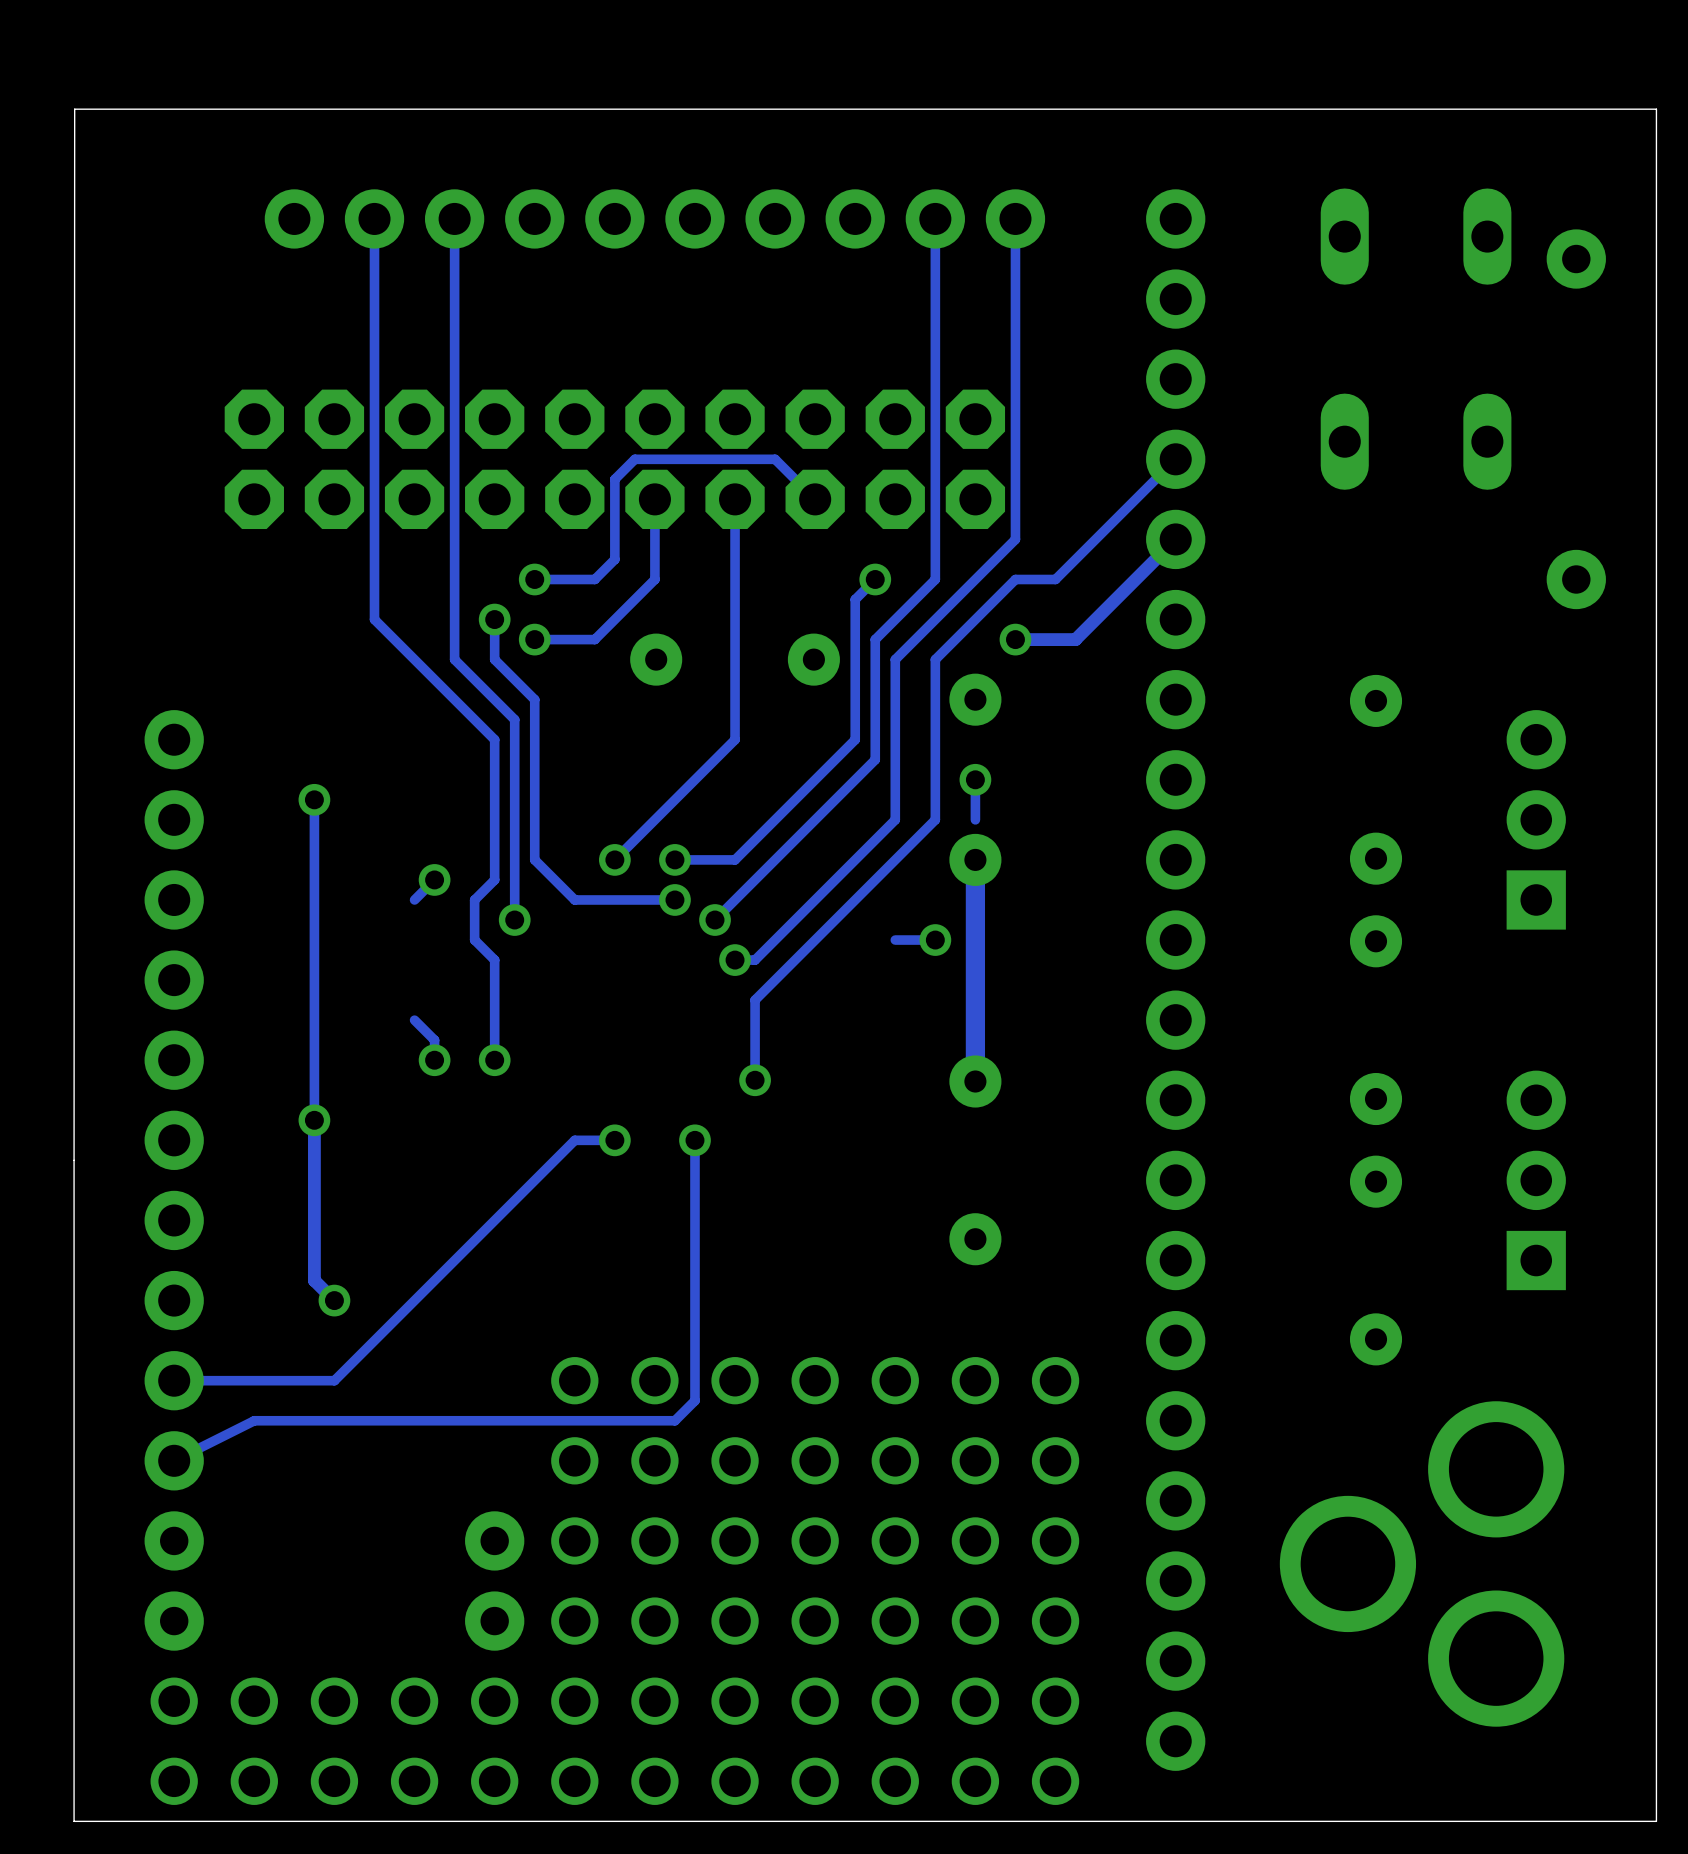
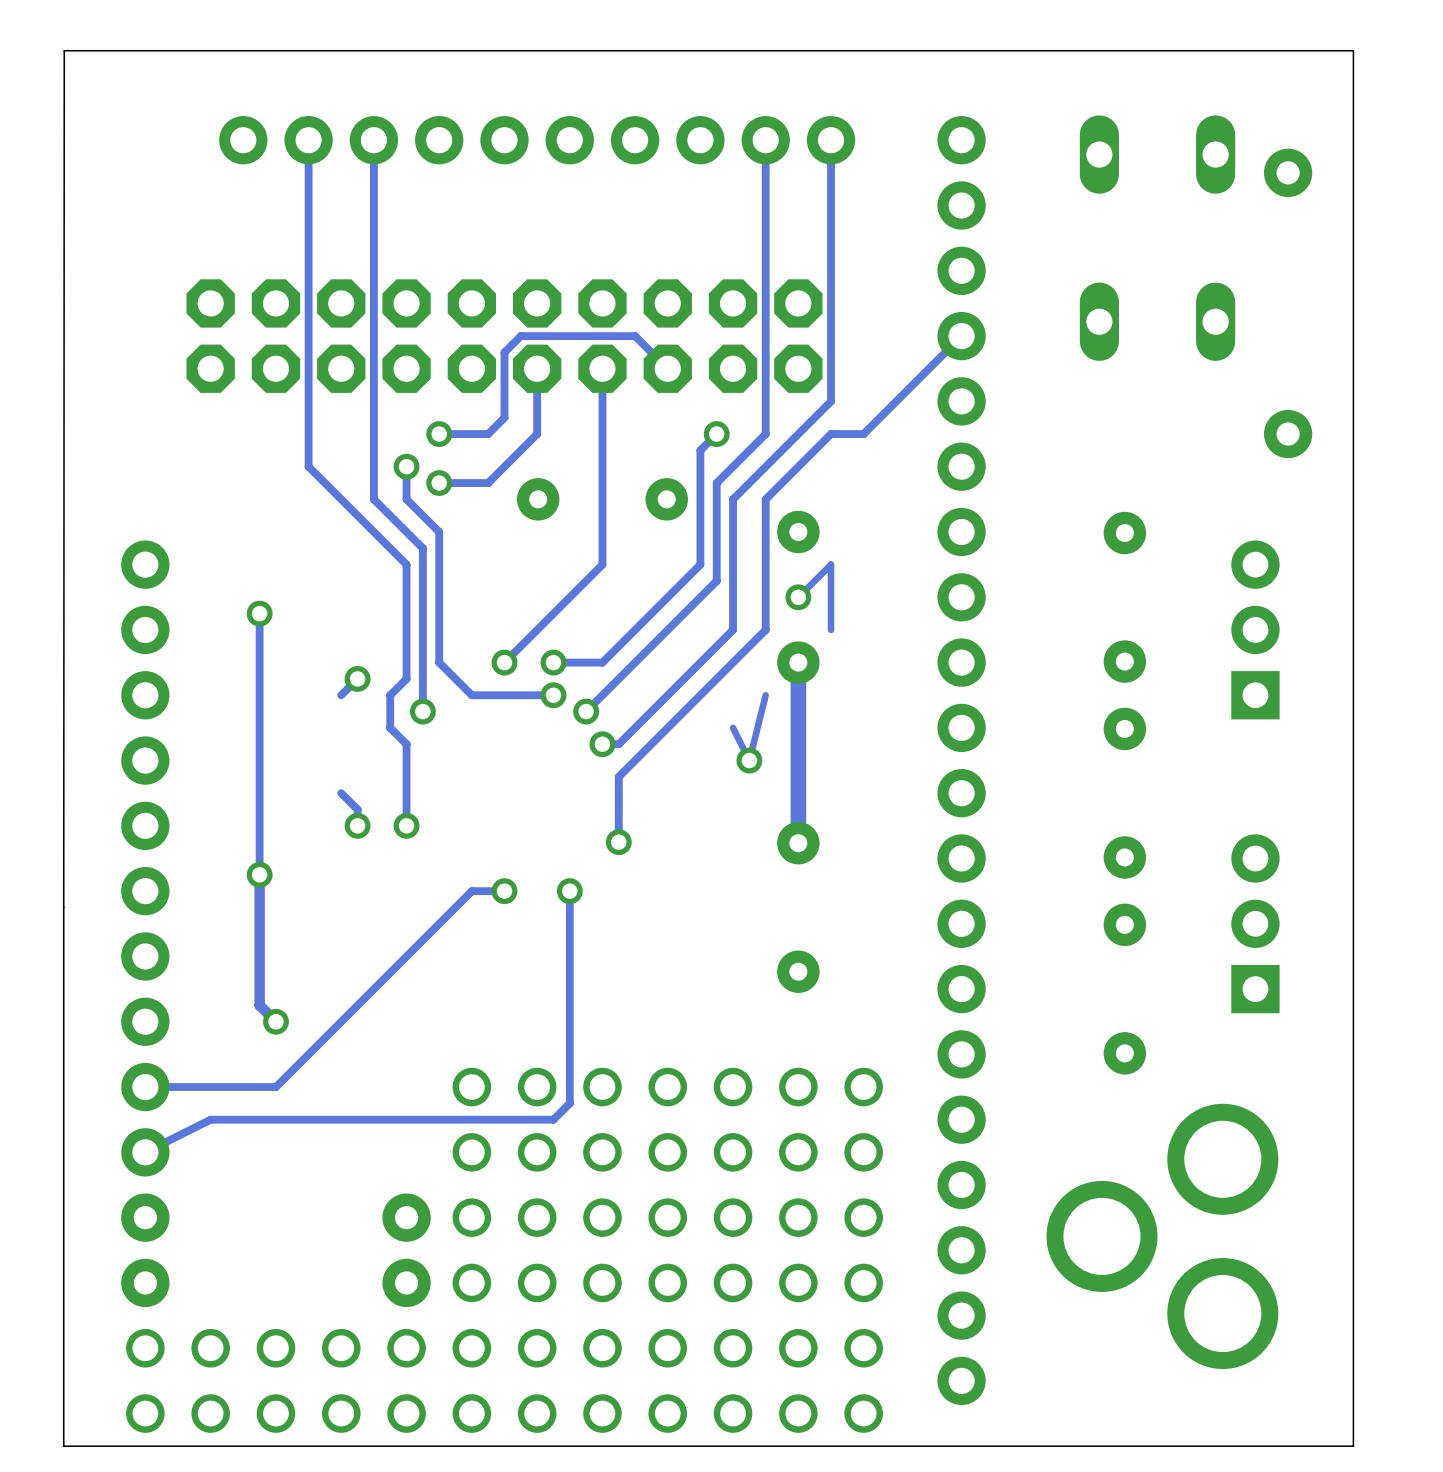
track: (1175, 539) (1075, 639) (1015, 639) -> none
via: (1015, 639) -> none
track: (975, 779) (975, 819) -> (798, 597) (831, 564) (831, 629)
track: (935, 940) (895, 940) -> (765, 695) (749, 760) (733, 727)
via position: (935, 940) -> (749, 760)

